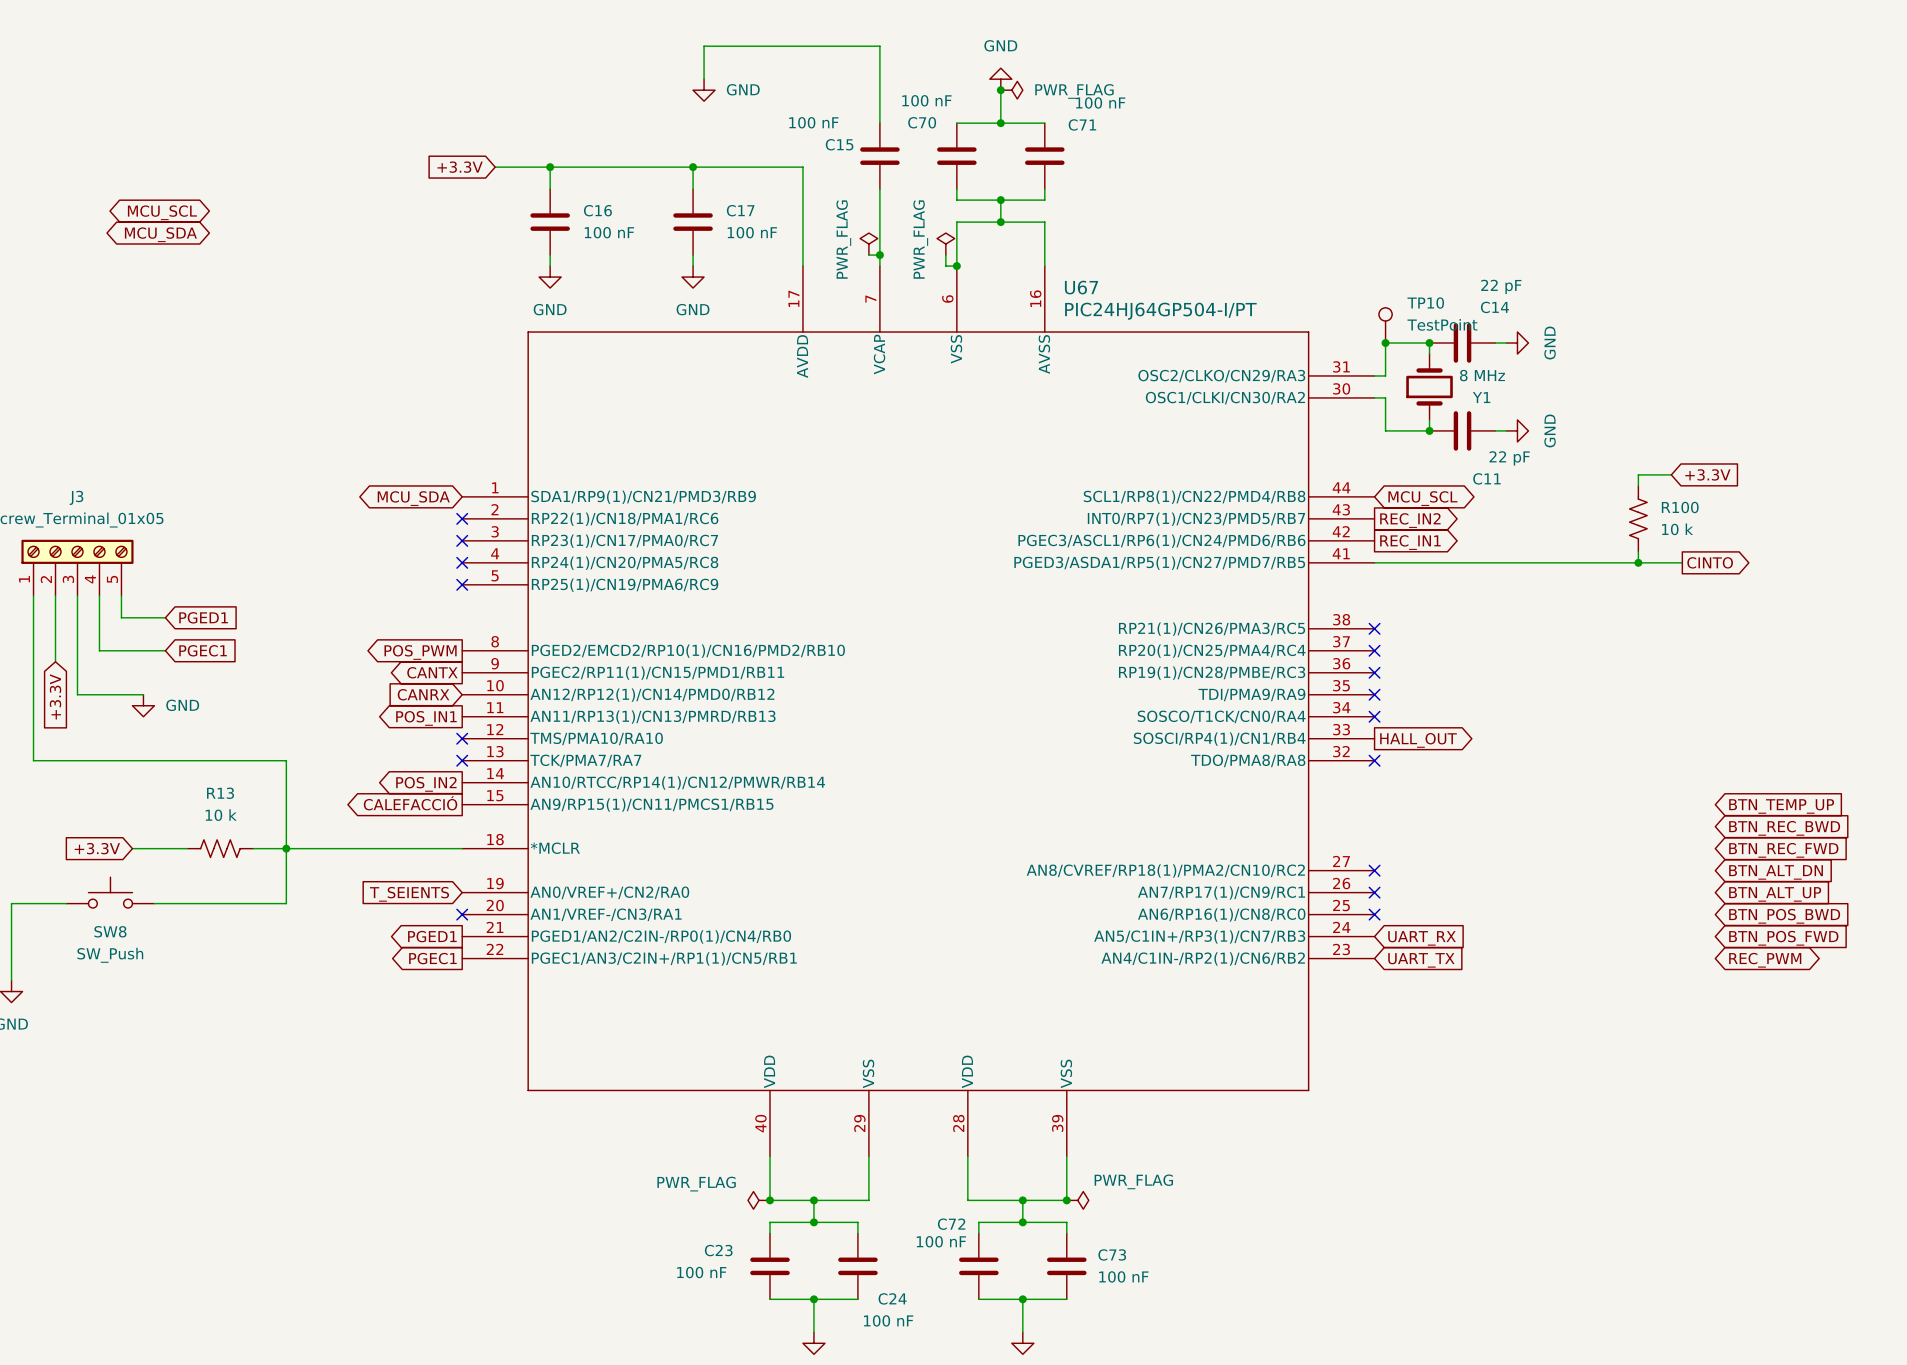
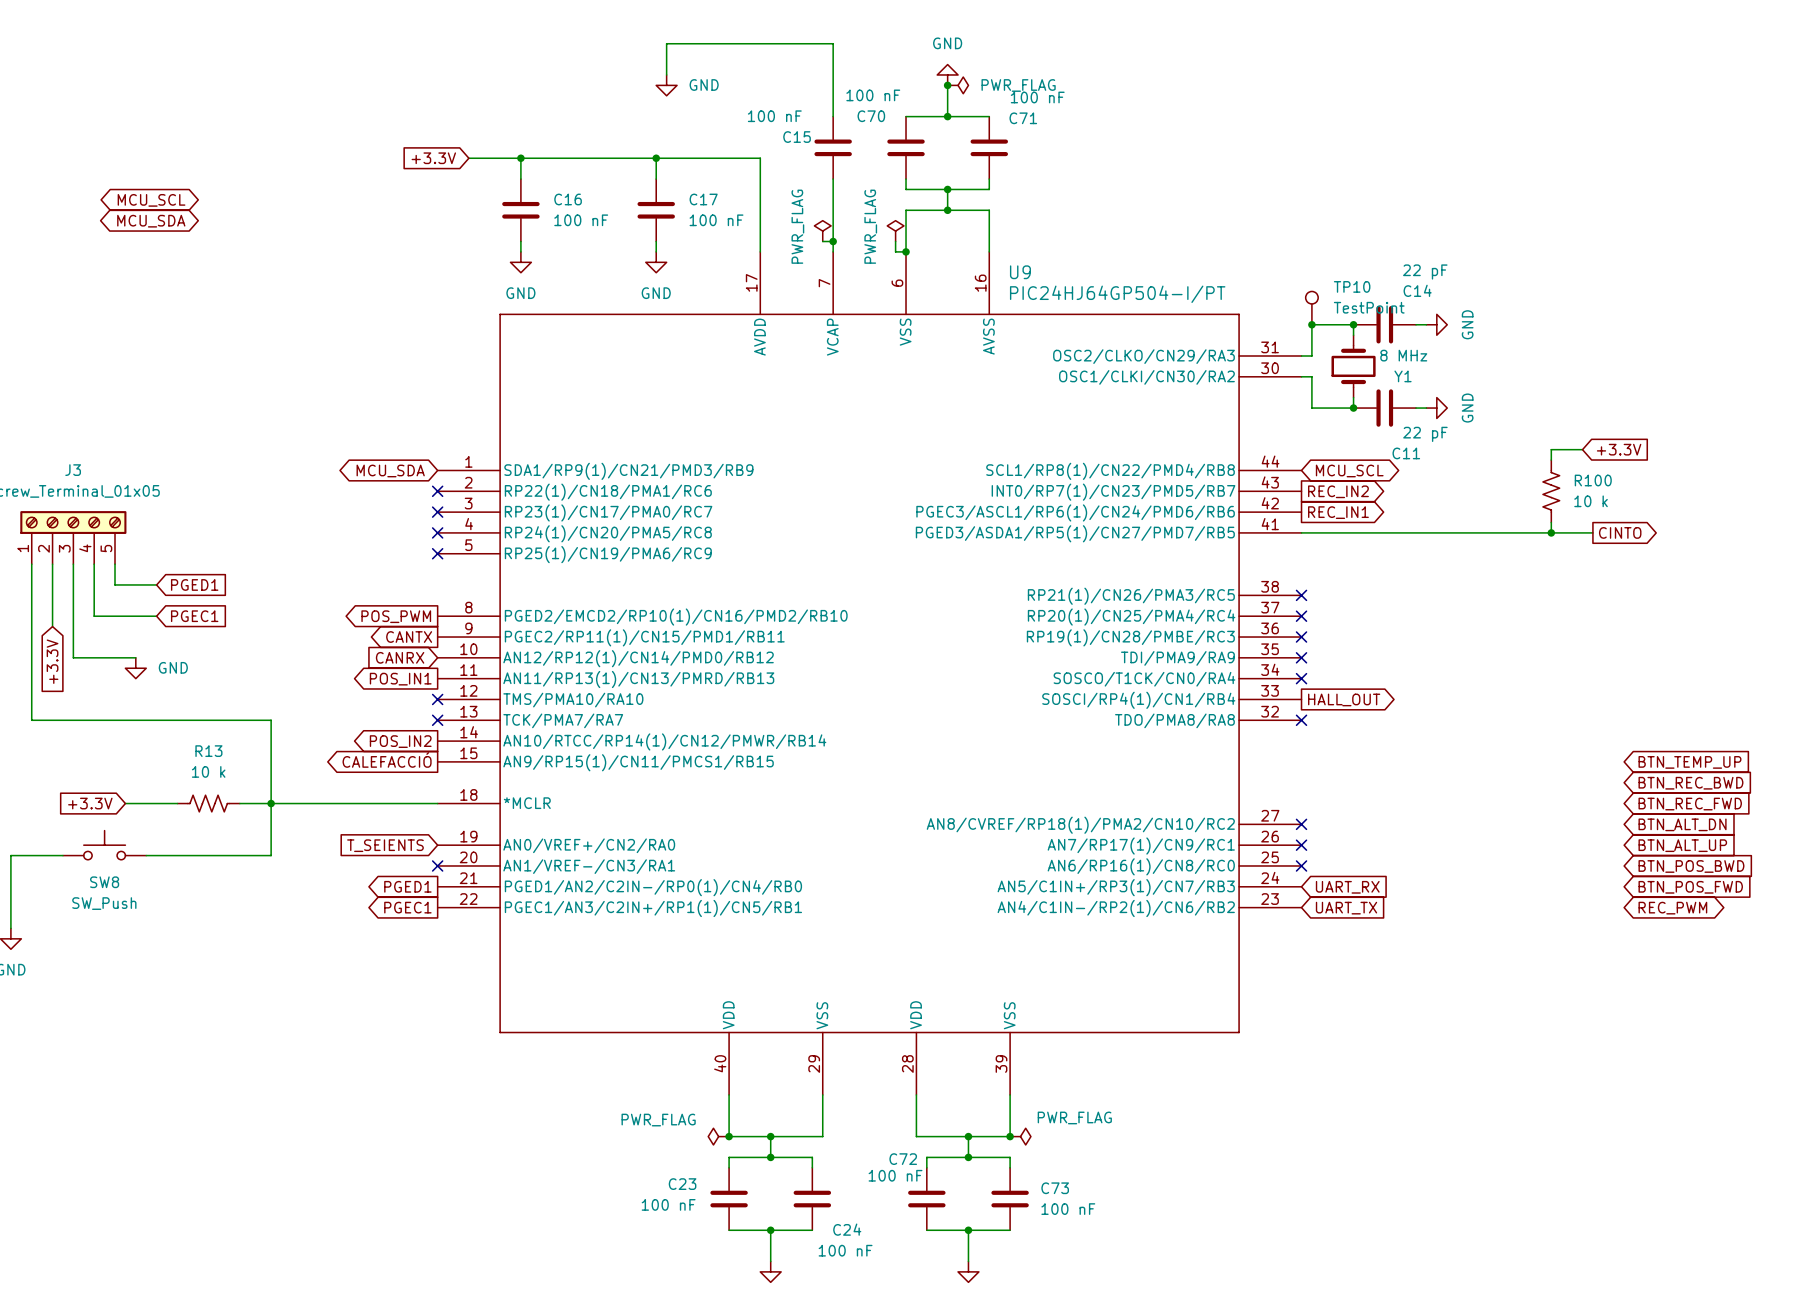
U67 name: U67 (1081, 287) -> U9 (1020, 272)

